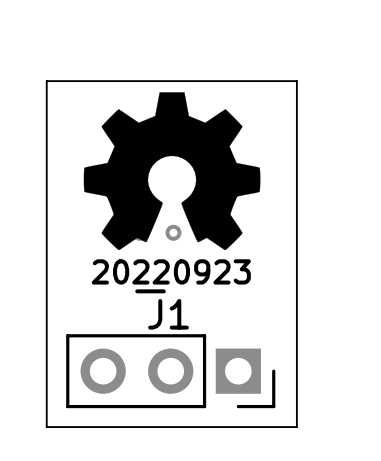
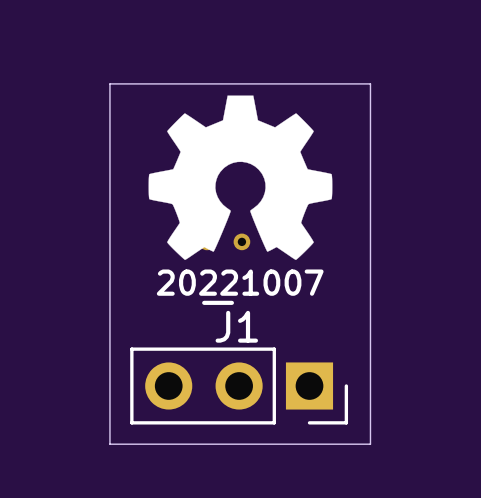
drawing shape: [91, 259, 251, 294] -> [156, 269, 324, 305]

